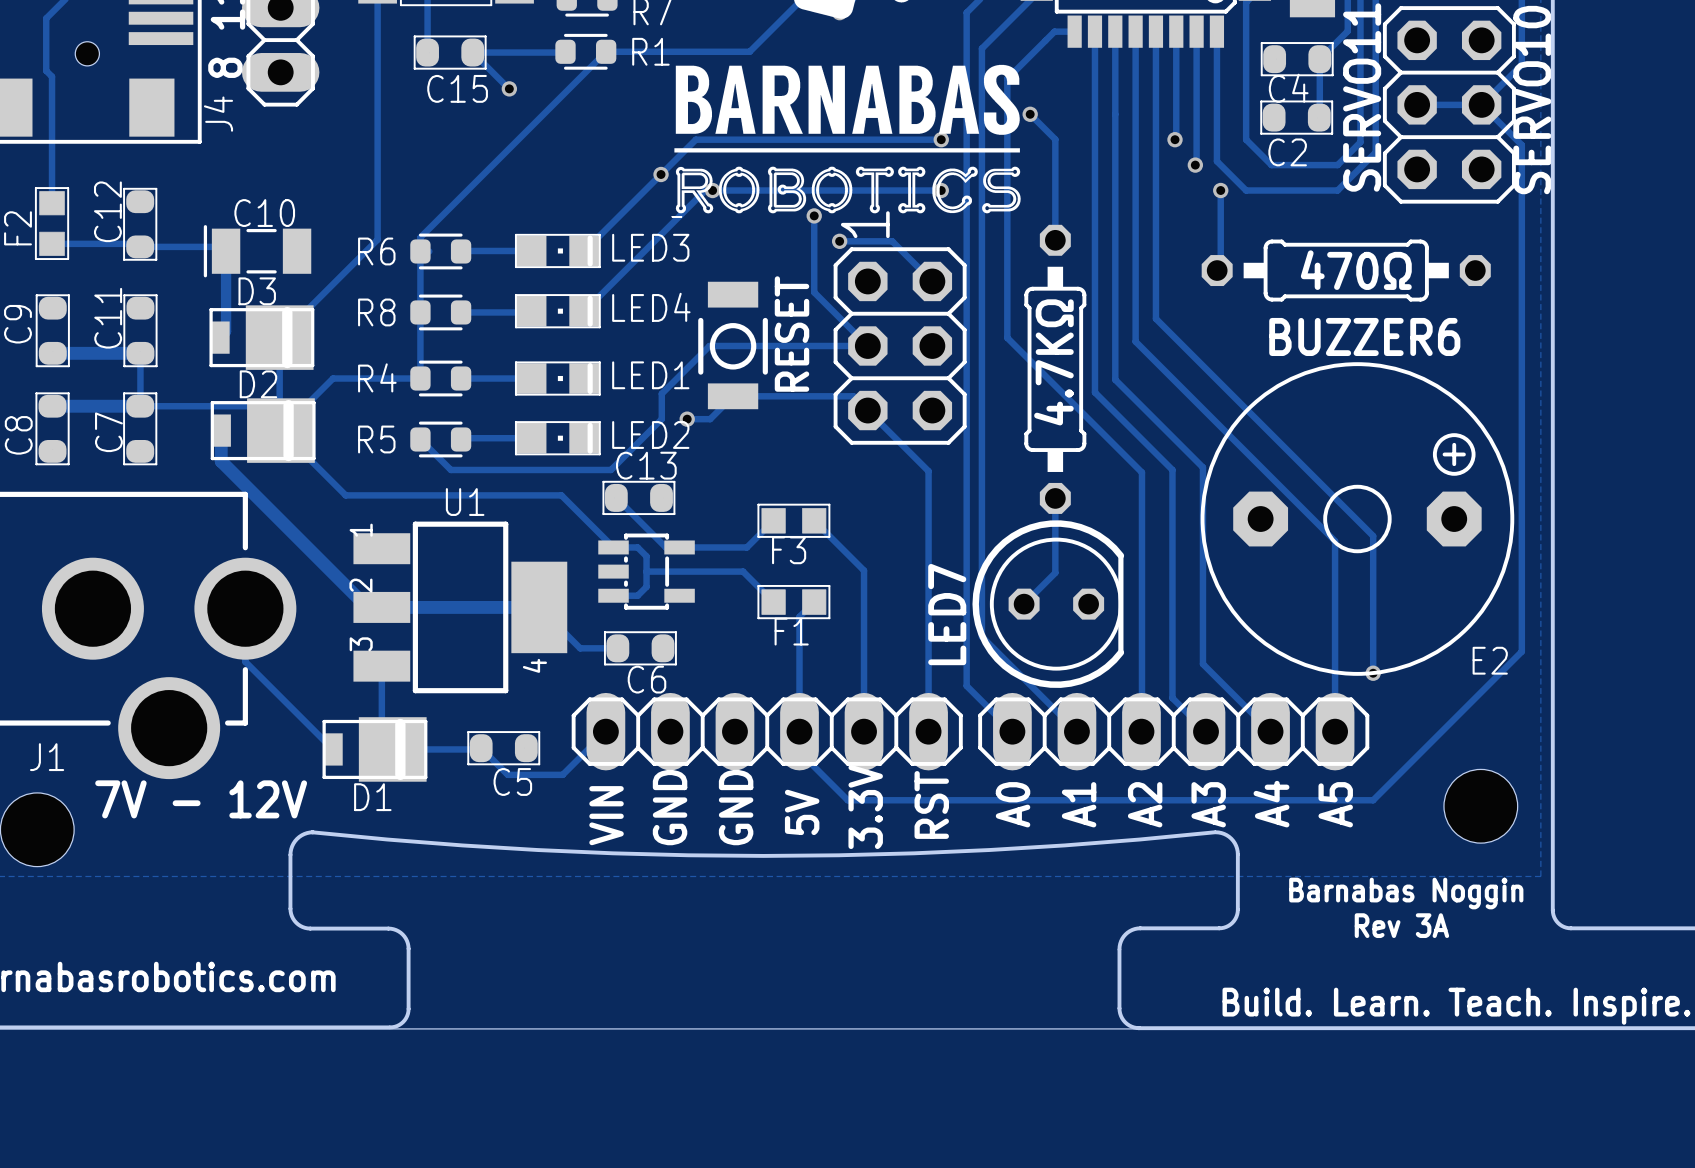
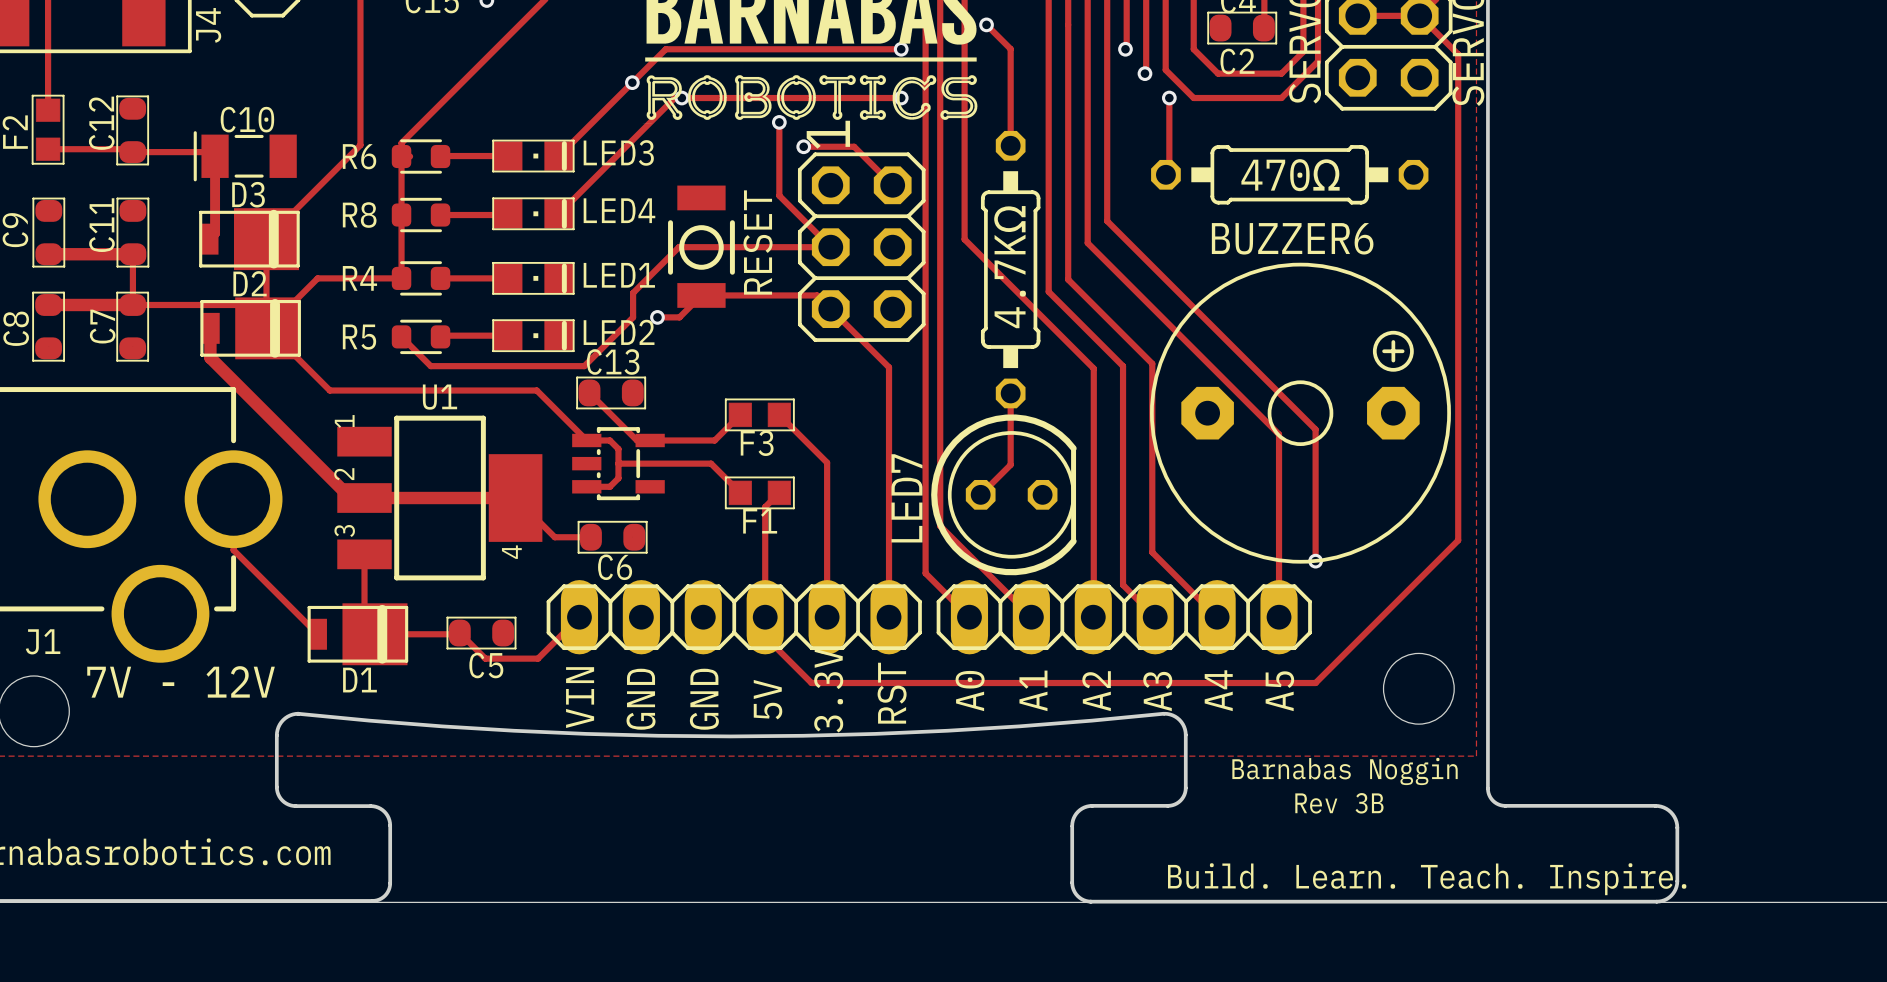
E2 name: E2 (1490, 660) -> none
text: Rev 3A (1401, 925) -> Rev 3B (1339, 803)

